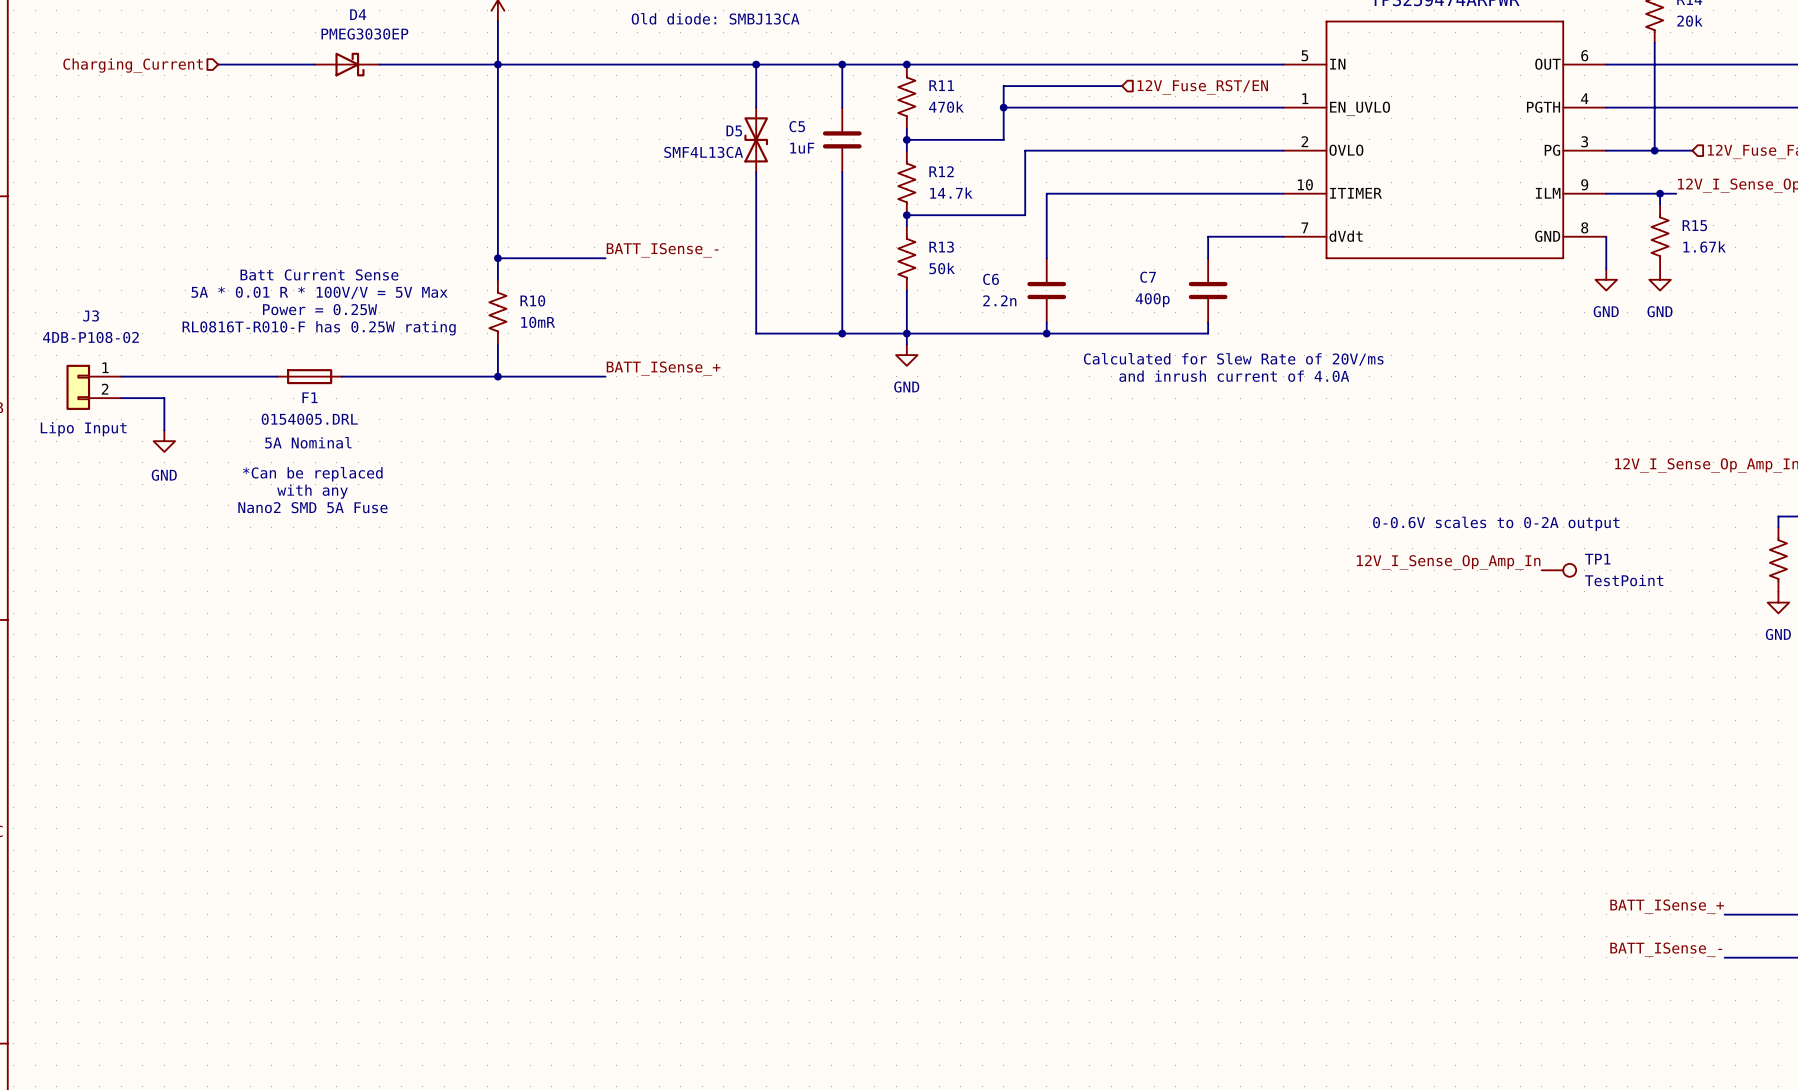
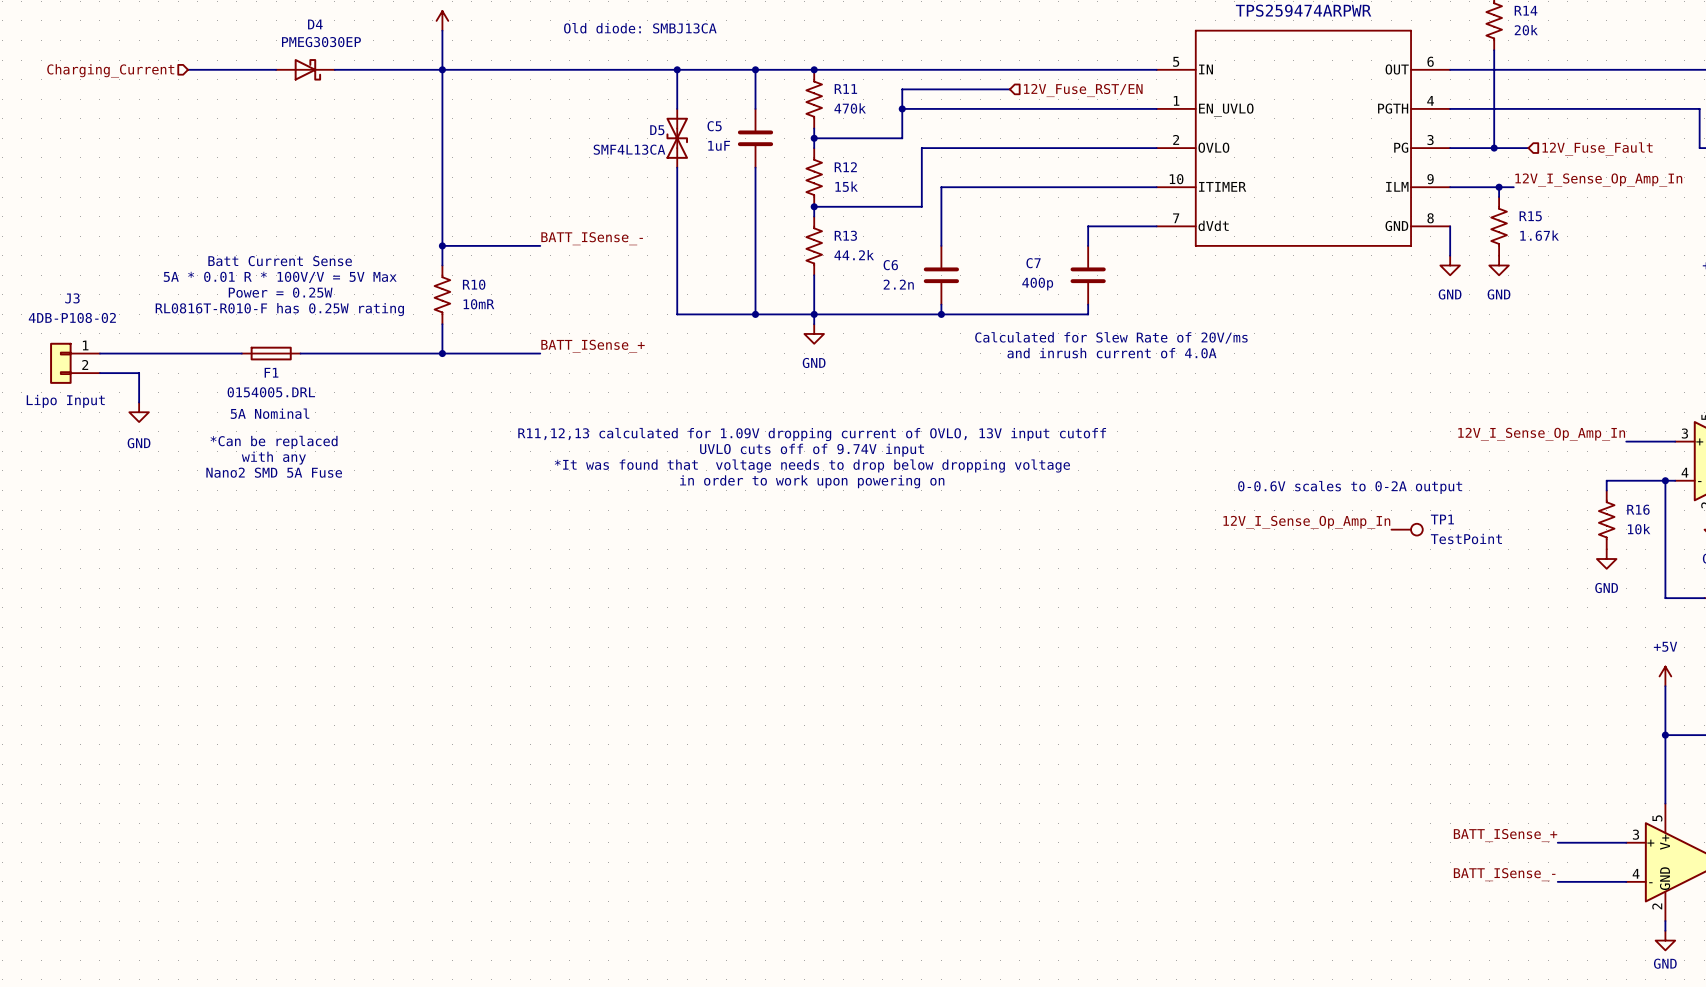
R12 value: 14.7k (951, 193) -> 15k (846, 186)
R13 value: 50k (942, 268) -> 44.2k (854, 255)
text: none -> R11,12,13 calculated for 1.09V dropping current of OVLO, 13V input cutoff (812, 434)
text: none -> UVLO cuts off of 9.74V input (812, 450)
text: none -> *It was found that voltage needs to drop below dropping voltage (812, 465)
text: none -> in order to work upon powering on (812, 481)

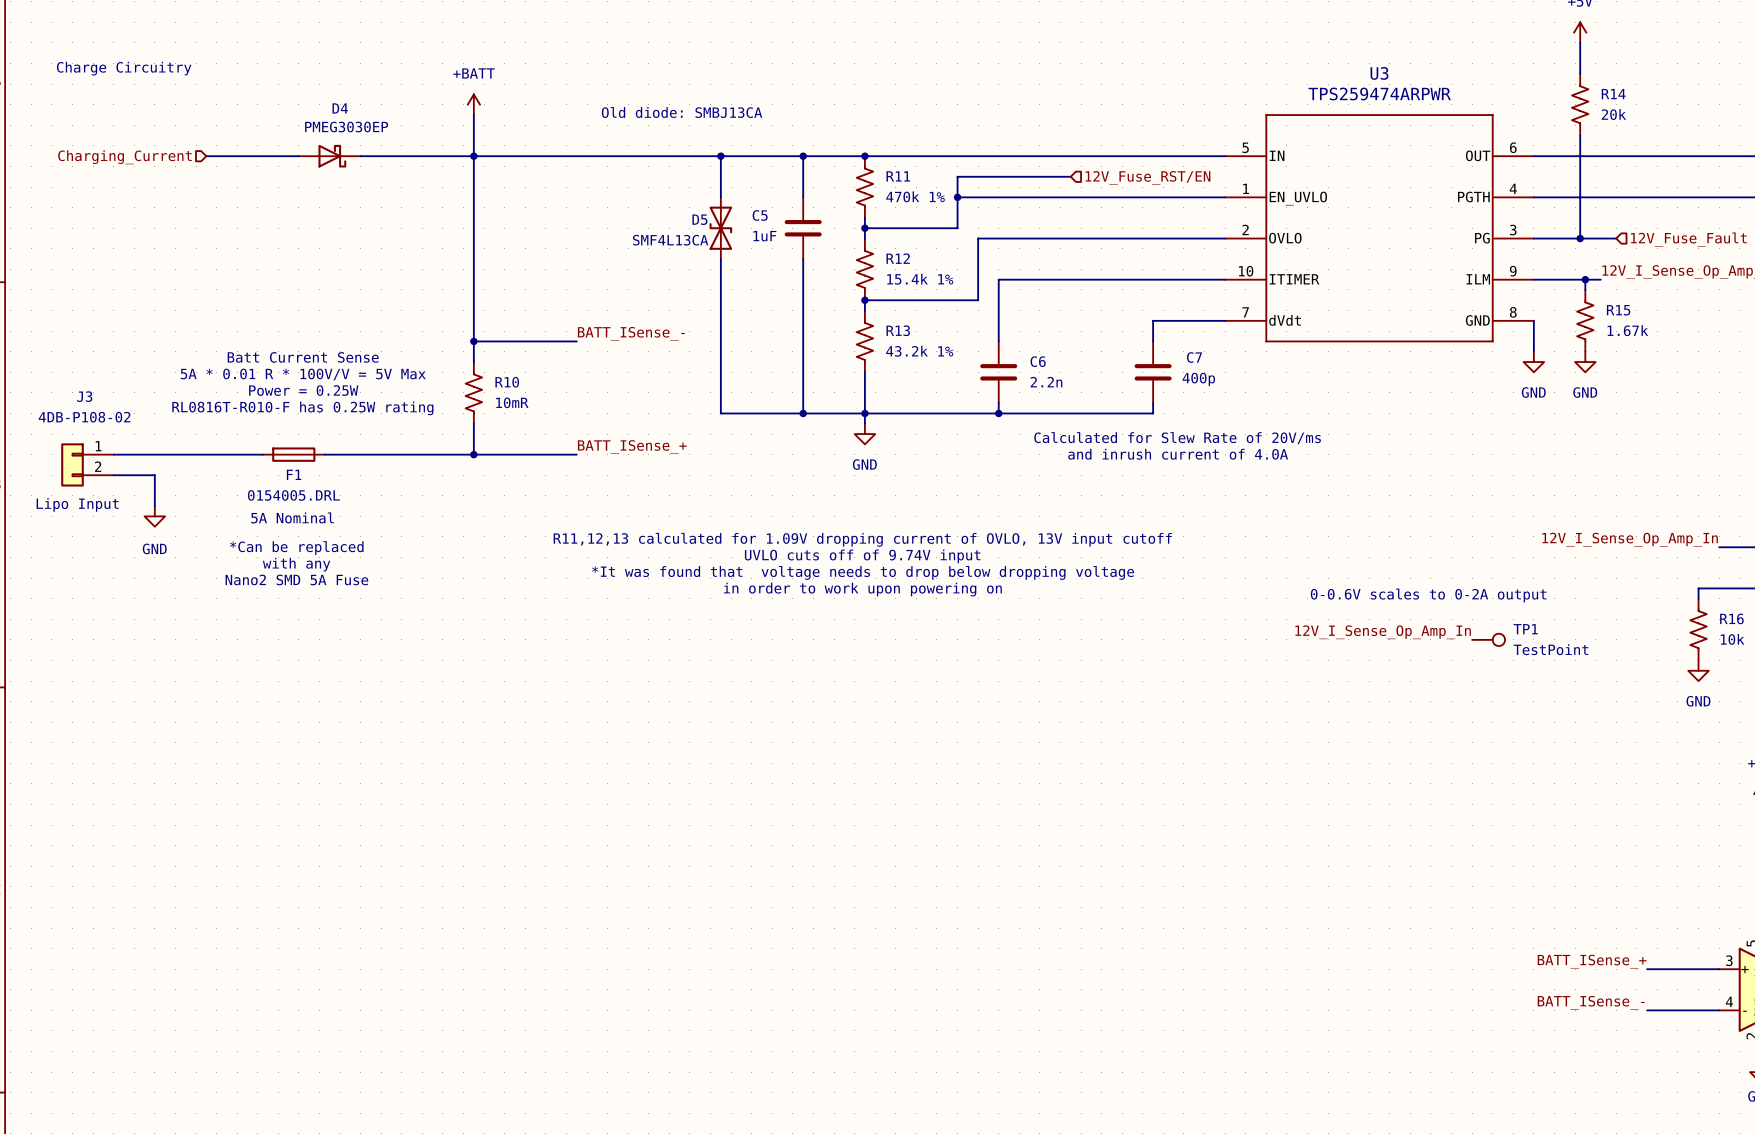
R11 value: 470k (850, 108) -> 470k 1% (915, 196)
R12 value: 15k (846, 186) -> 15.4k 1% (920, 279)
R13 value: 44.2k (854, 255) -> 43.2k 1% (919, 351)
C7 name position: C7 (1033, 263) -> C7 (1194, 357)
C6 name position: C6 (890, 265) -> C6 (1038, 361)
C6 value position: 2.2n (898, 284) -> 2.2n (1046, 382)
C7 value position: 400p (1037, 284) -> 400p (1198, 379)

